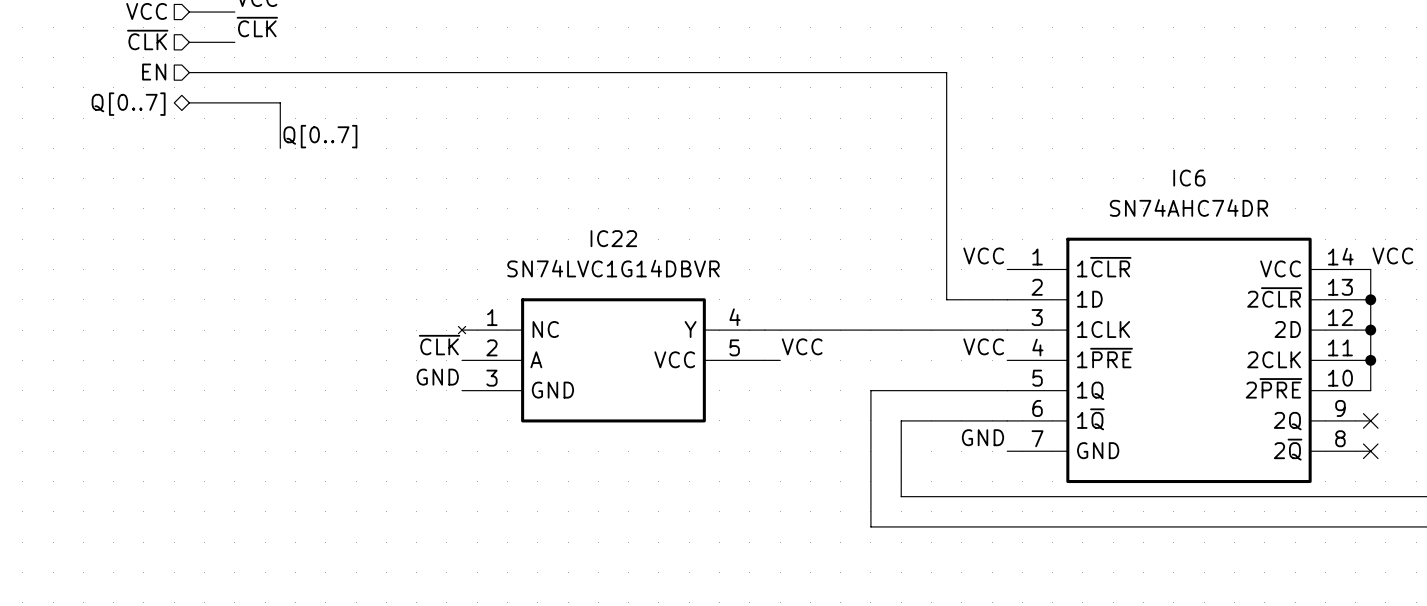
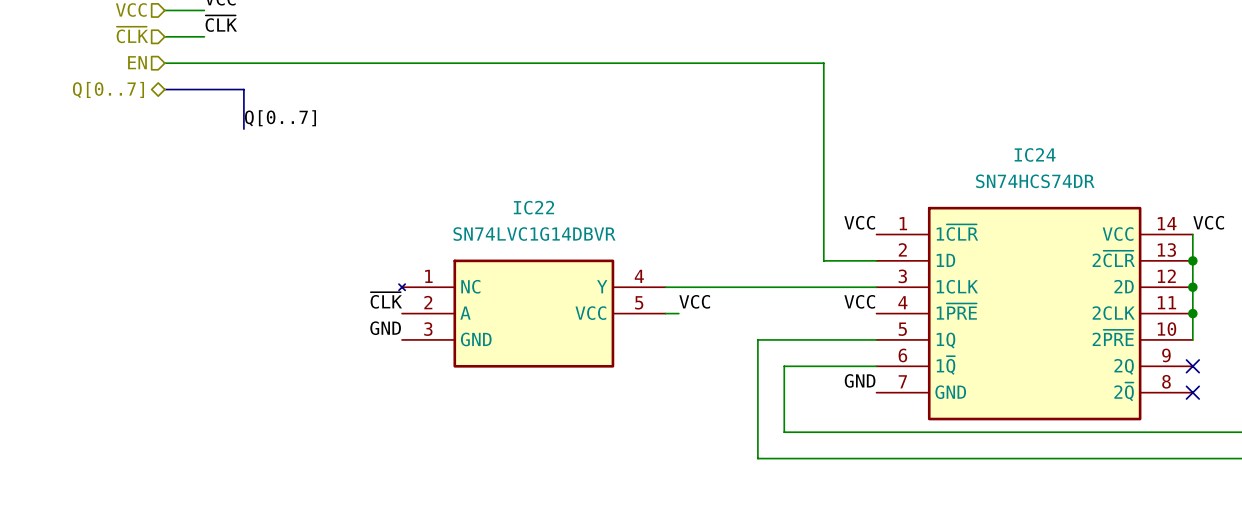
IC6 name: IC6 (1189, 178) -> IC24 (1035, 154)
IC6 value: SN74AHC74DR (1188, 207) -> SN74HCS74DR (1035, 181)

